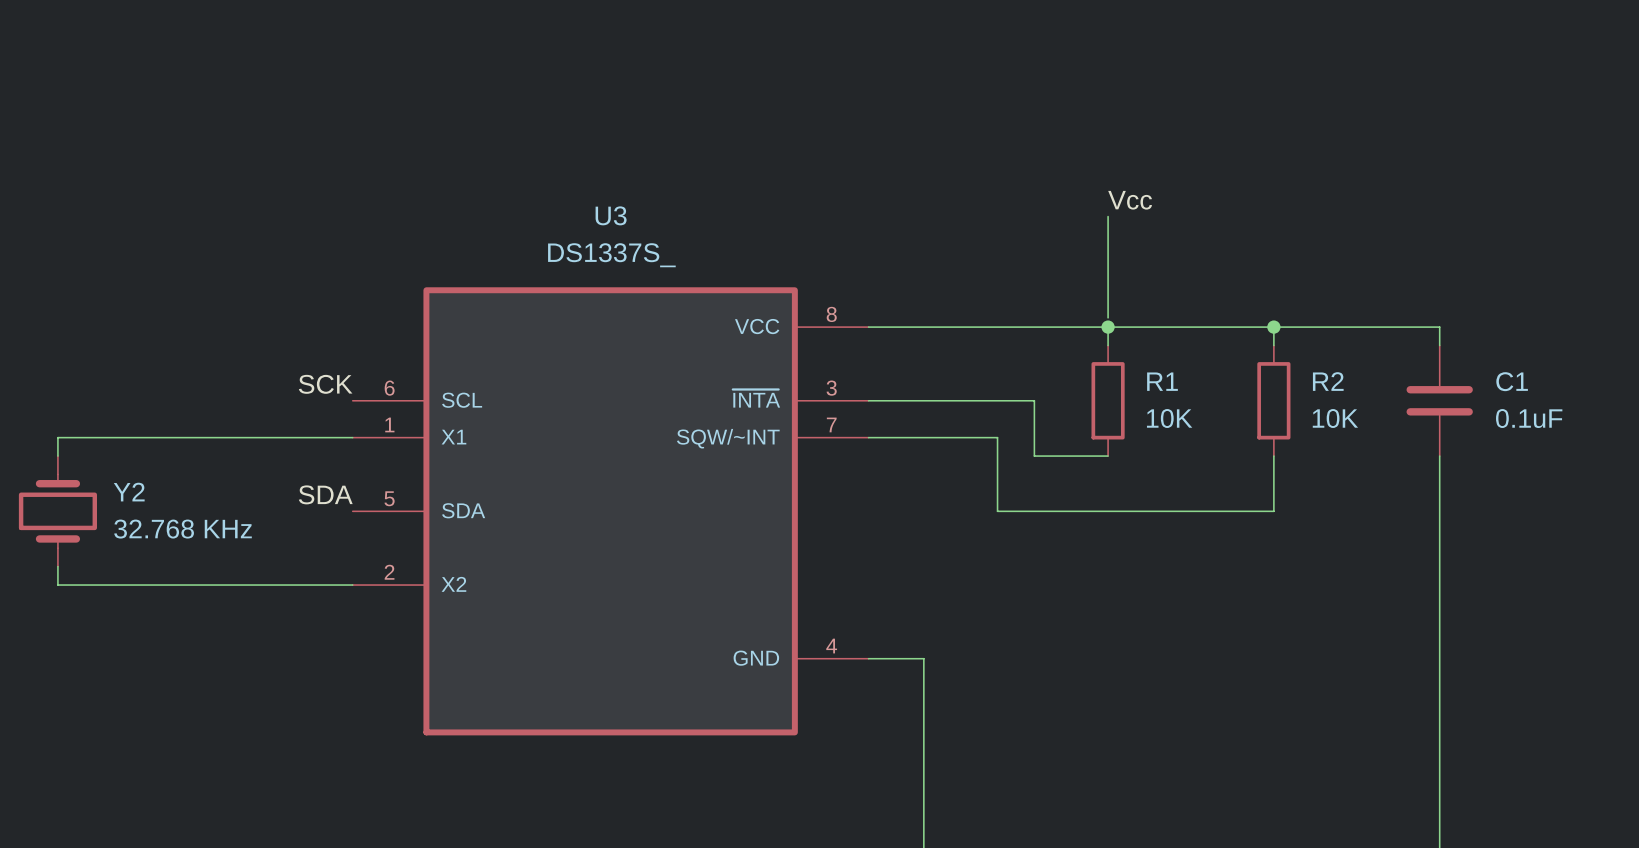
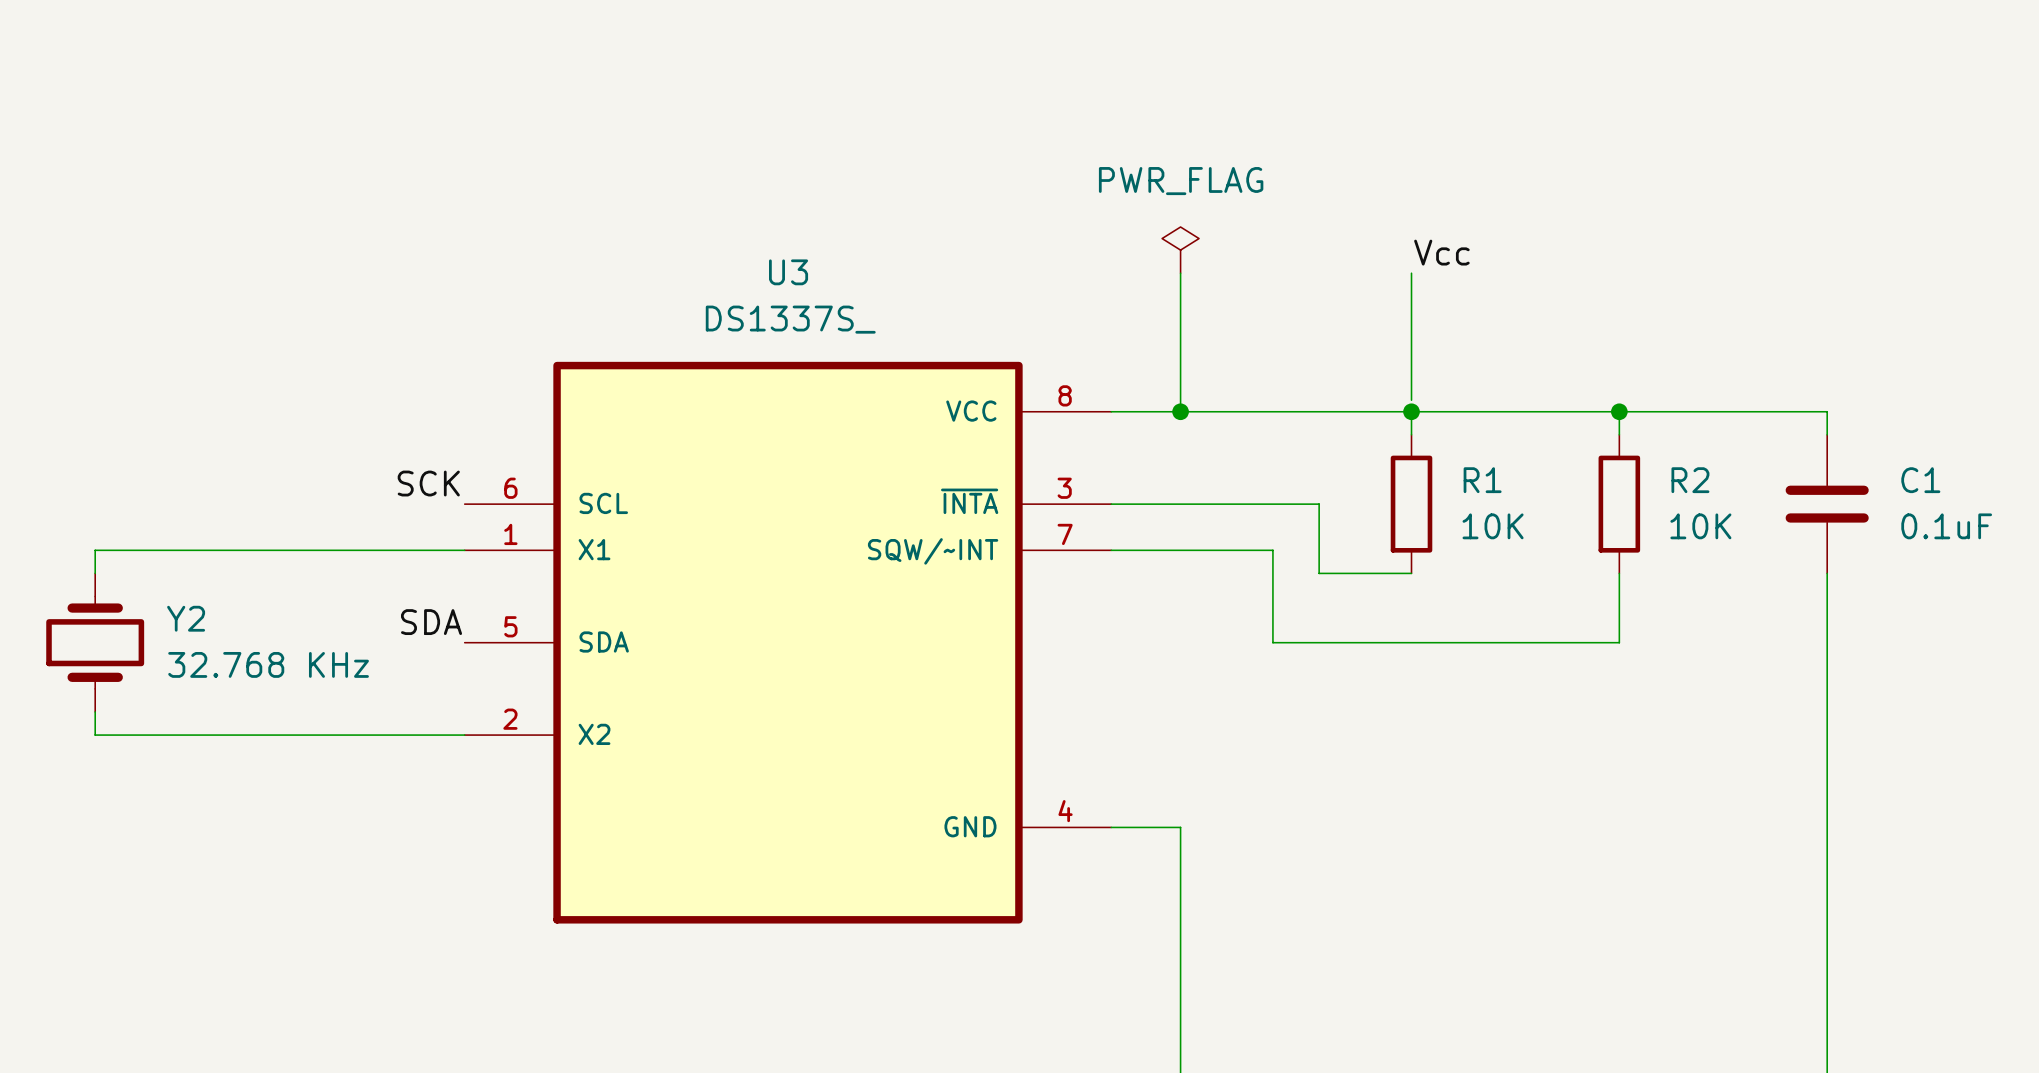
power symbol: none -> PWR_FLAG (1180, 250)
wire: none -> (1180, 273) (1180, 411)
junction: none -> (1180, 411)

